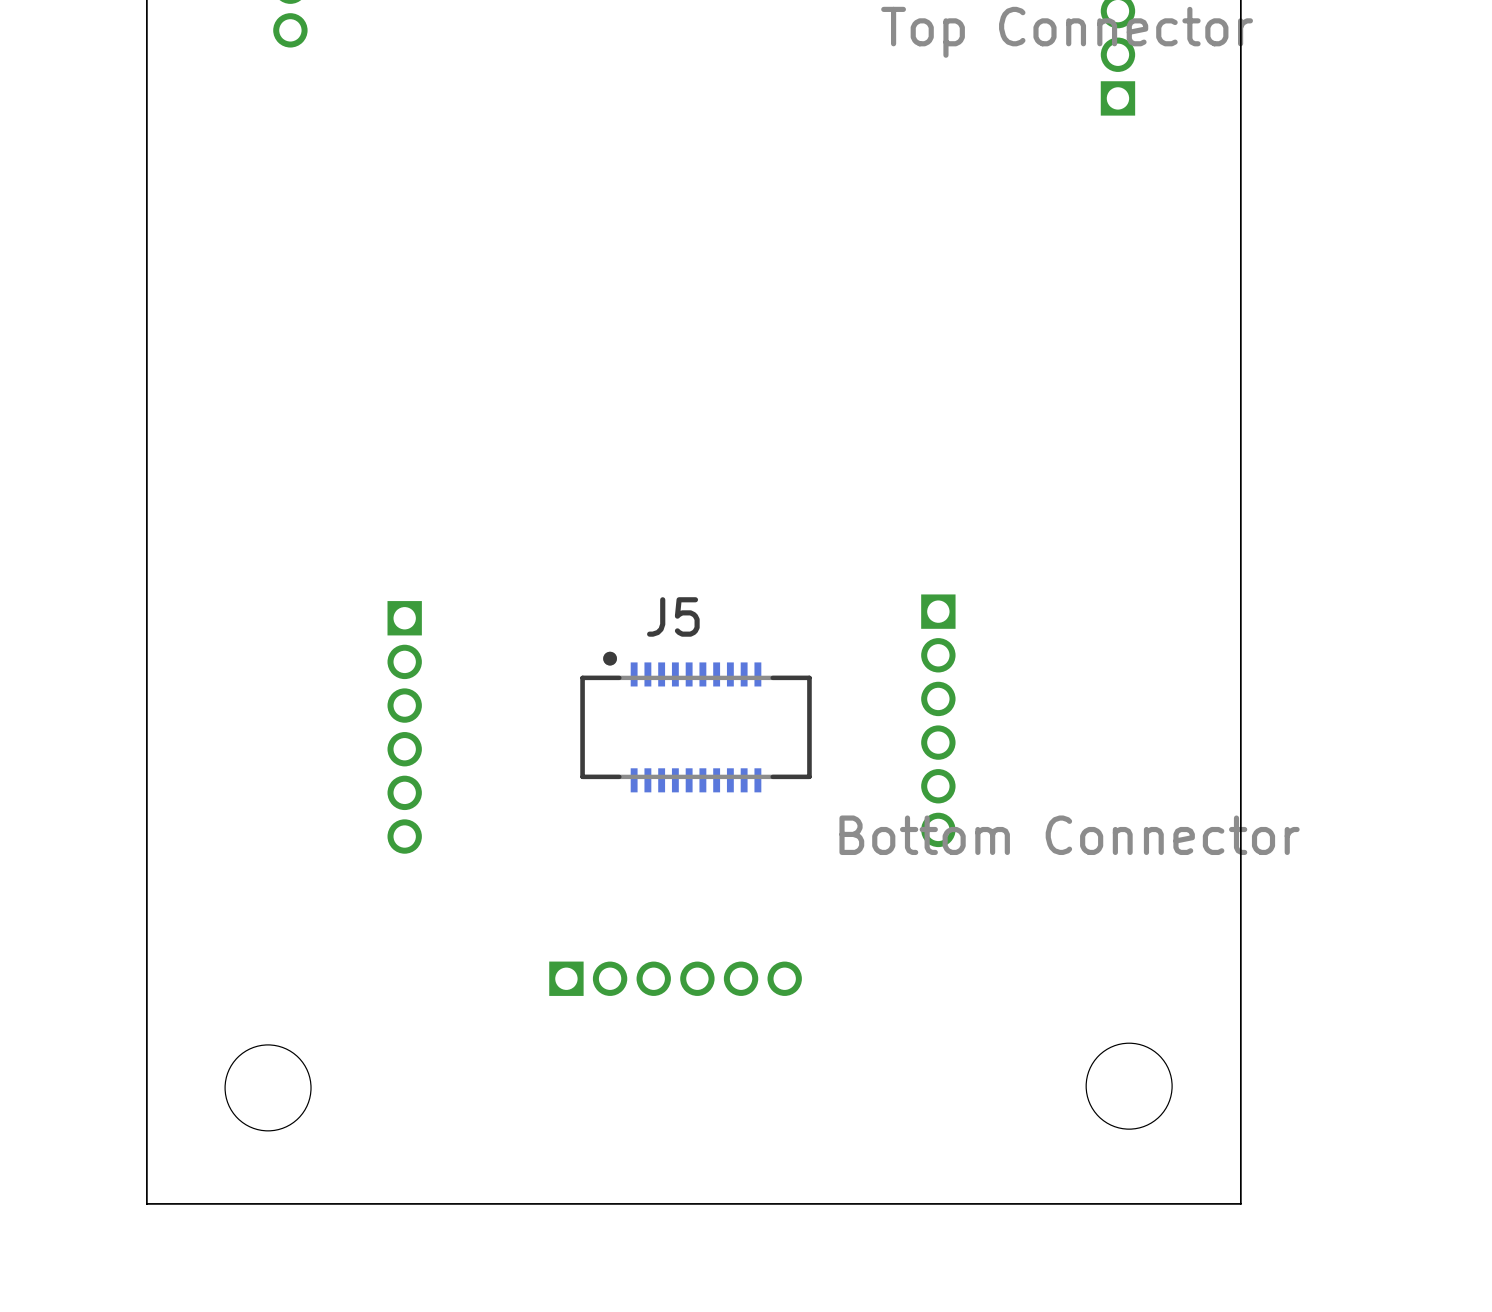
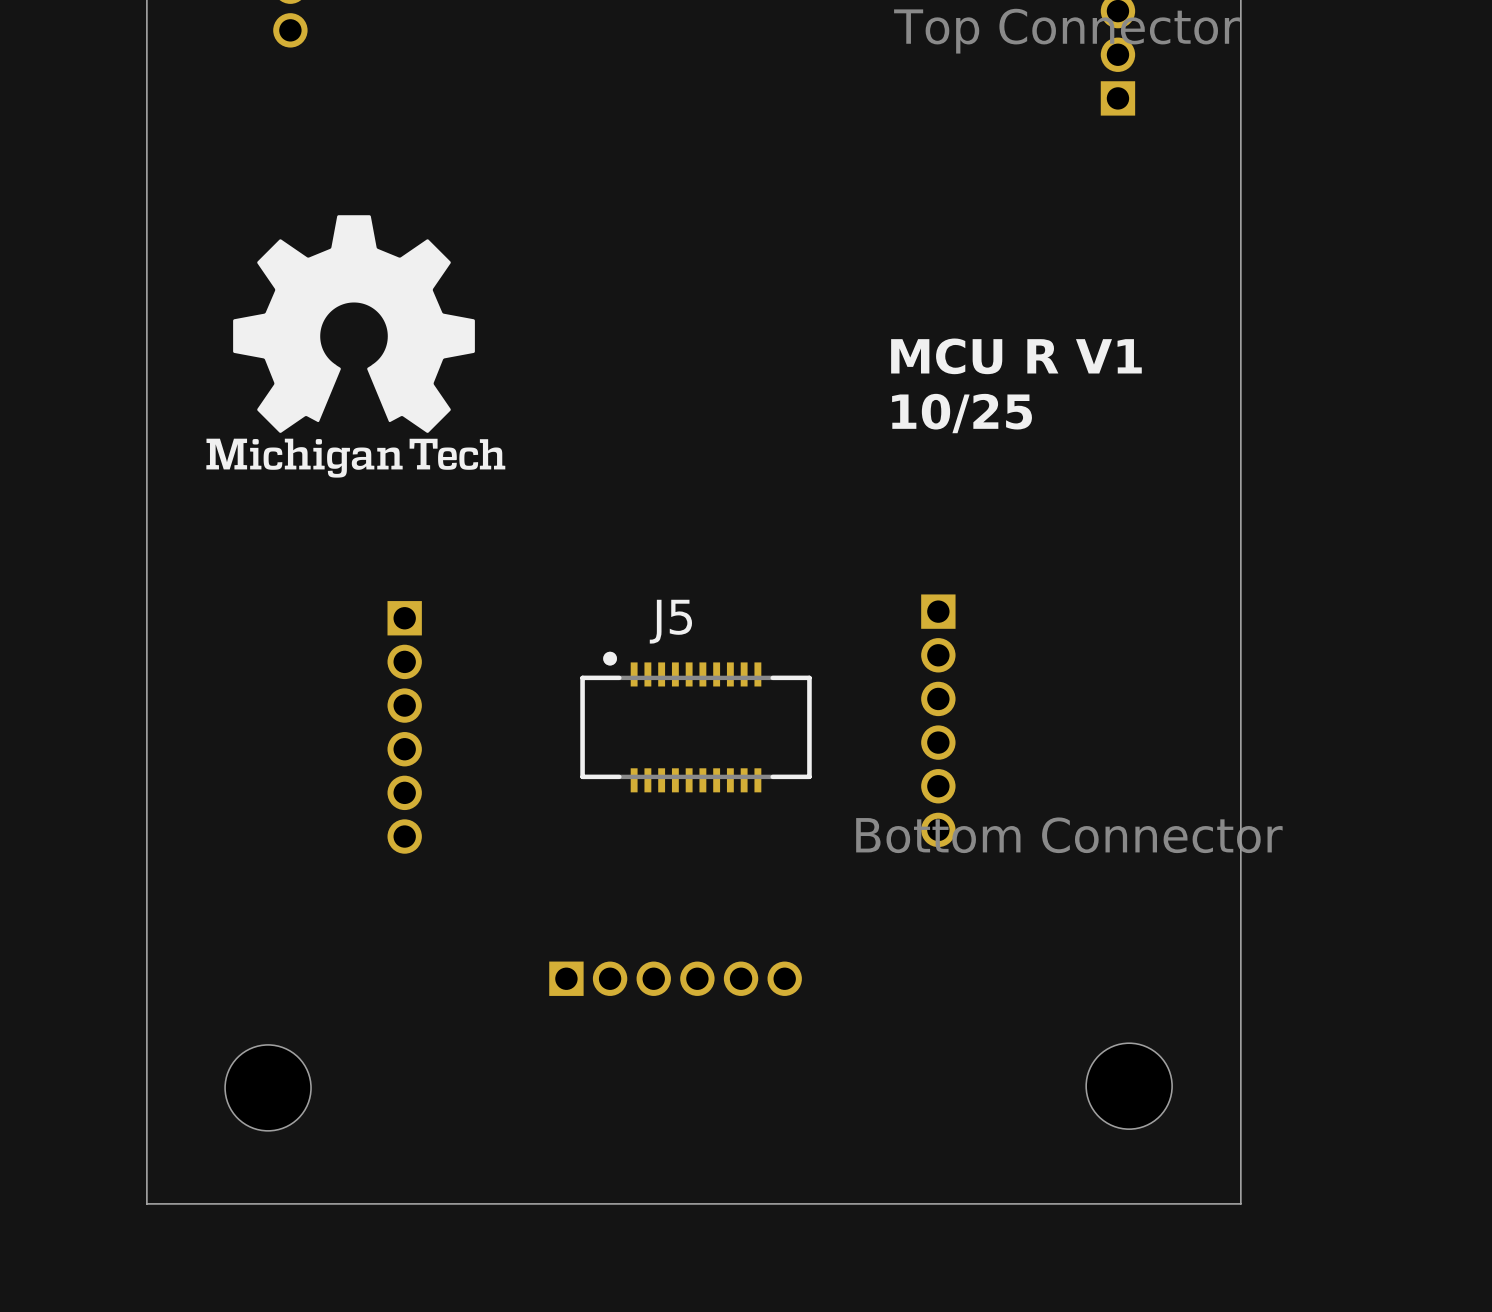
drawing: none -> [206, 215, 506, 478]
text: none -> MCU R V1 (1016, 356)
text: none -> 10/25 (962, 413)

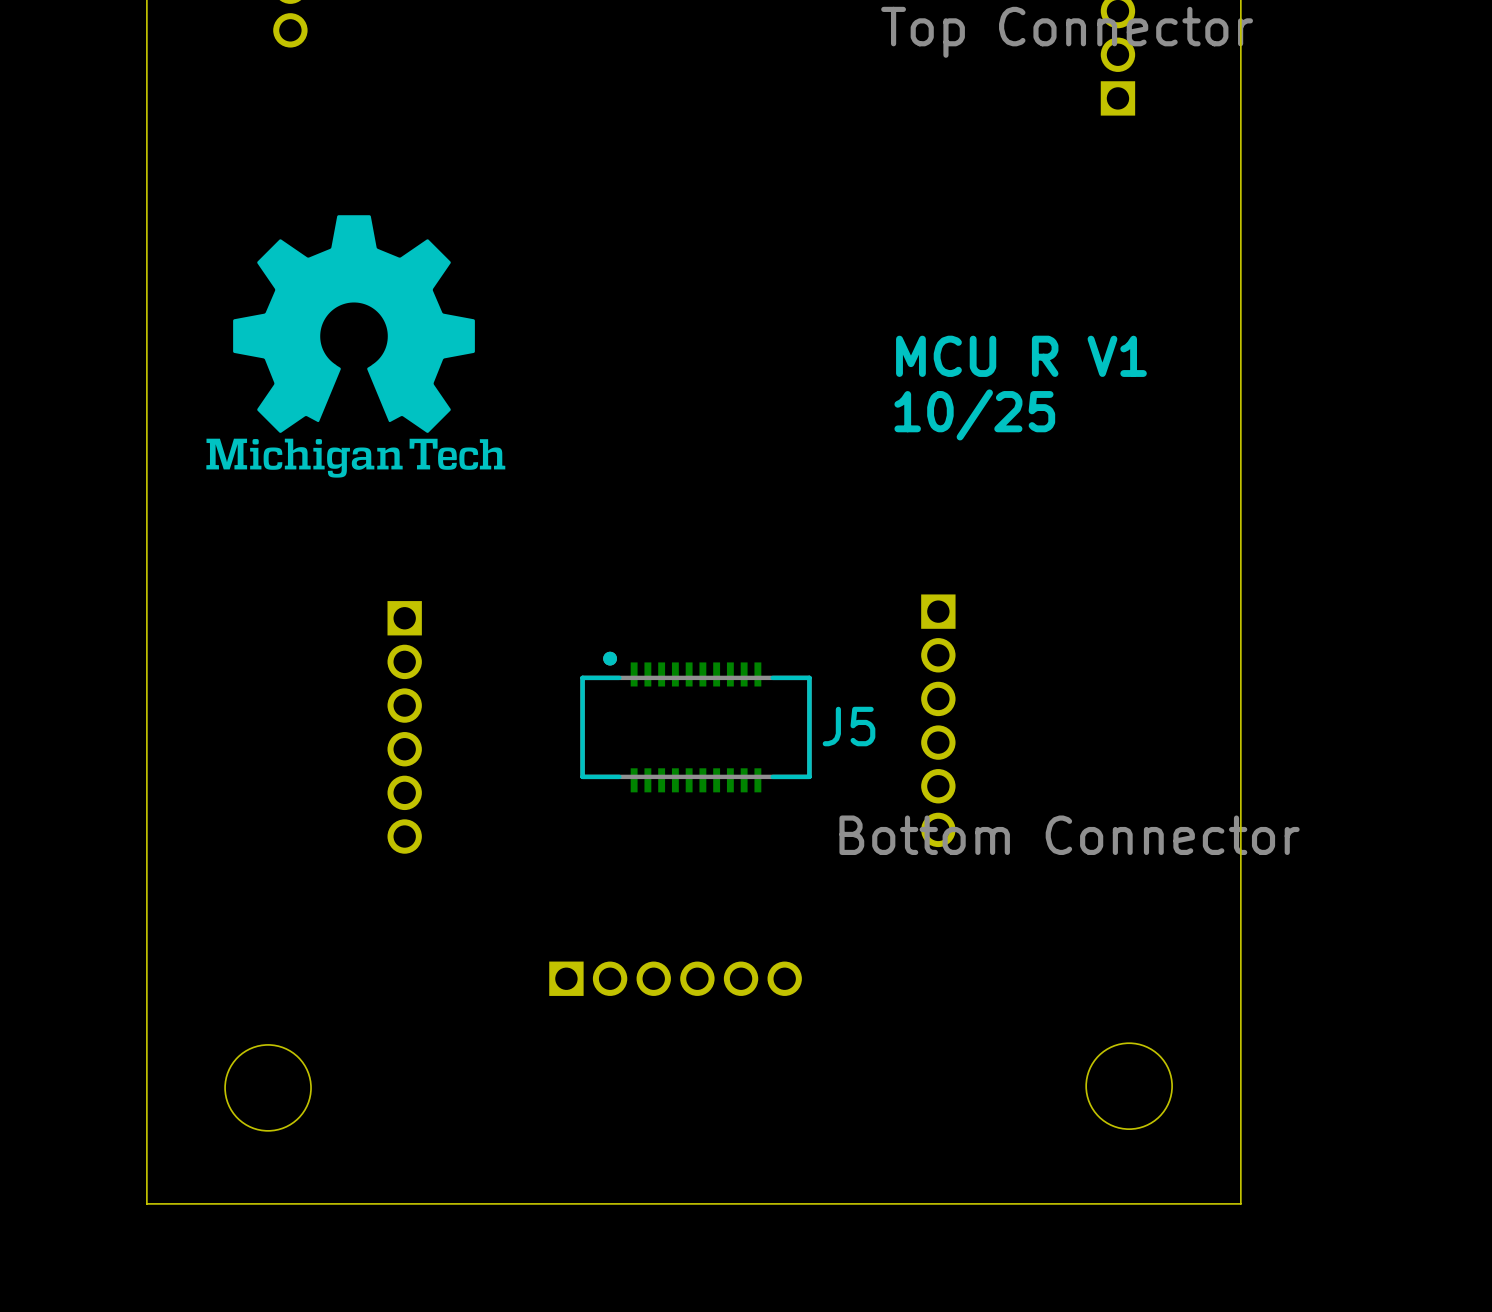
J5 name position: J5 (670, 621) -> J5 (849, 726)

